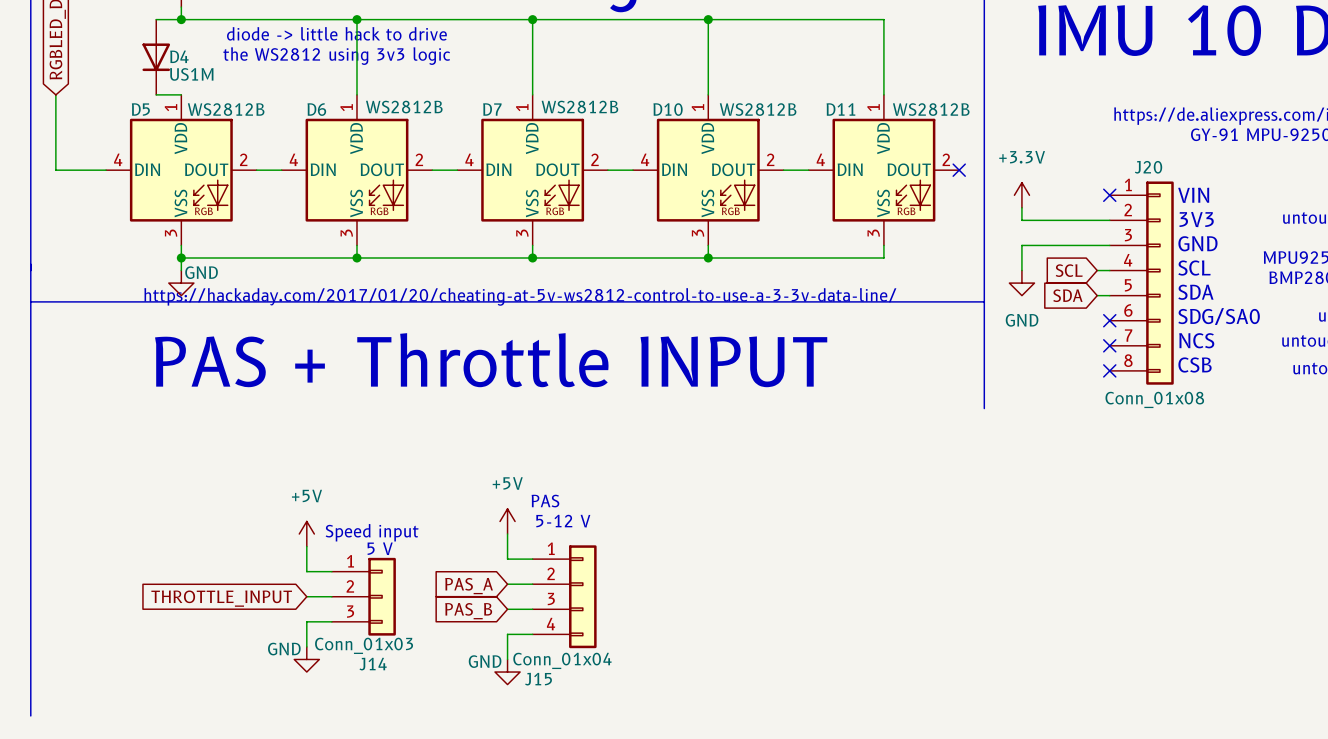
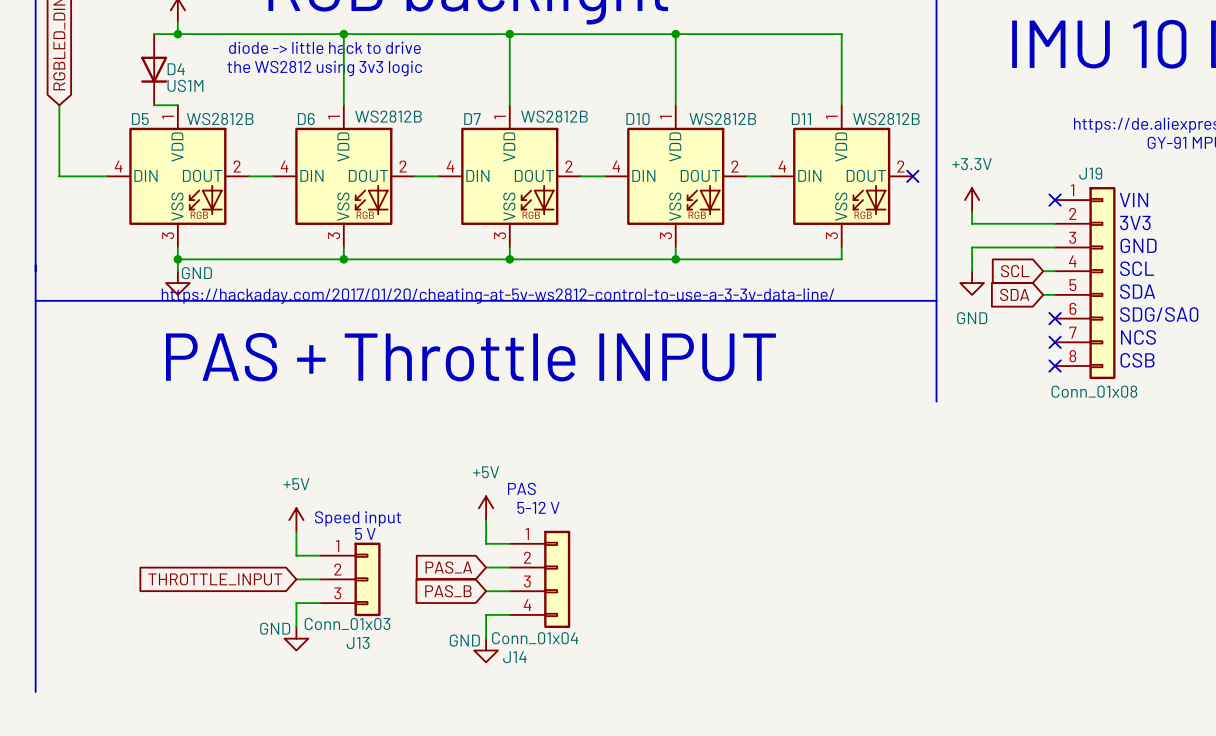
J20 name: J20 (1148, 167) -> J19 (1090, 173)
J14 name: J14 (373, 664) -> J13 (358, 643)
J15 name: J15 (538, 679) -> J14 (514, 657)

